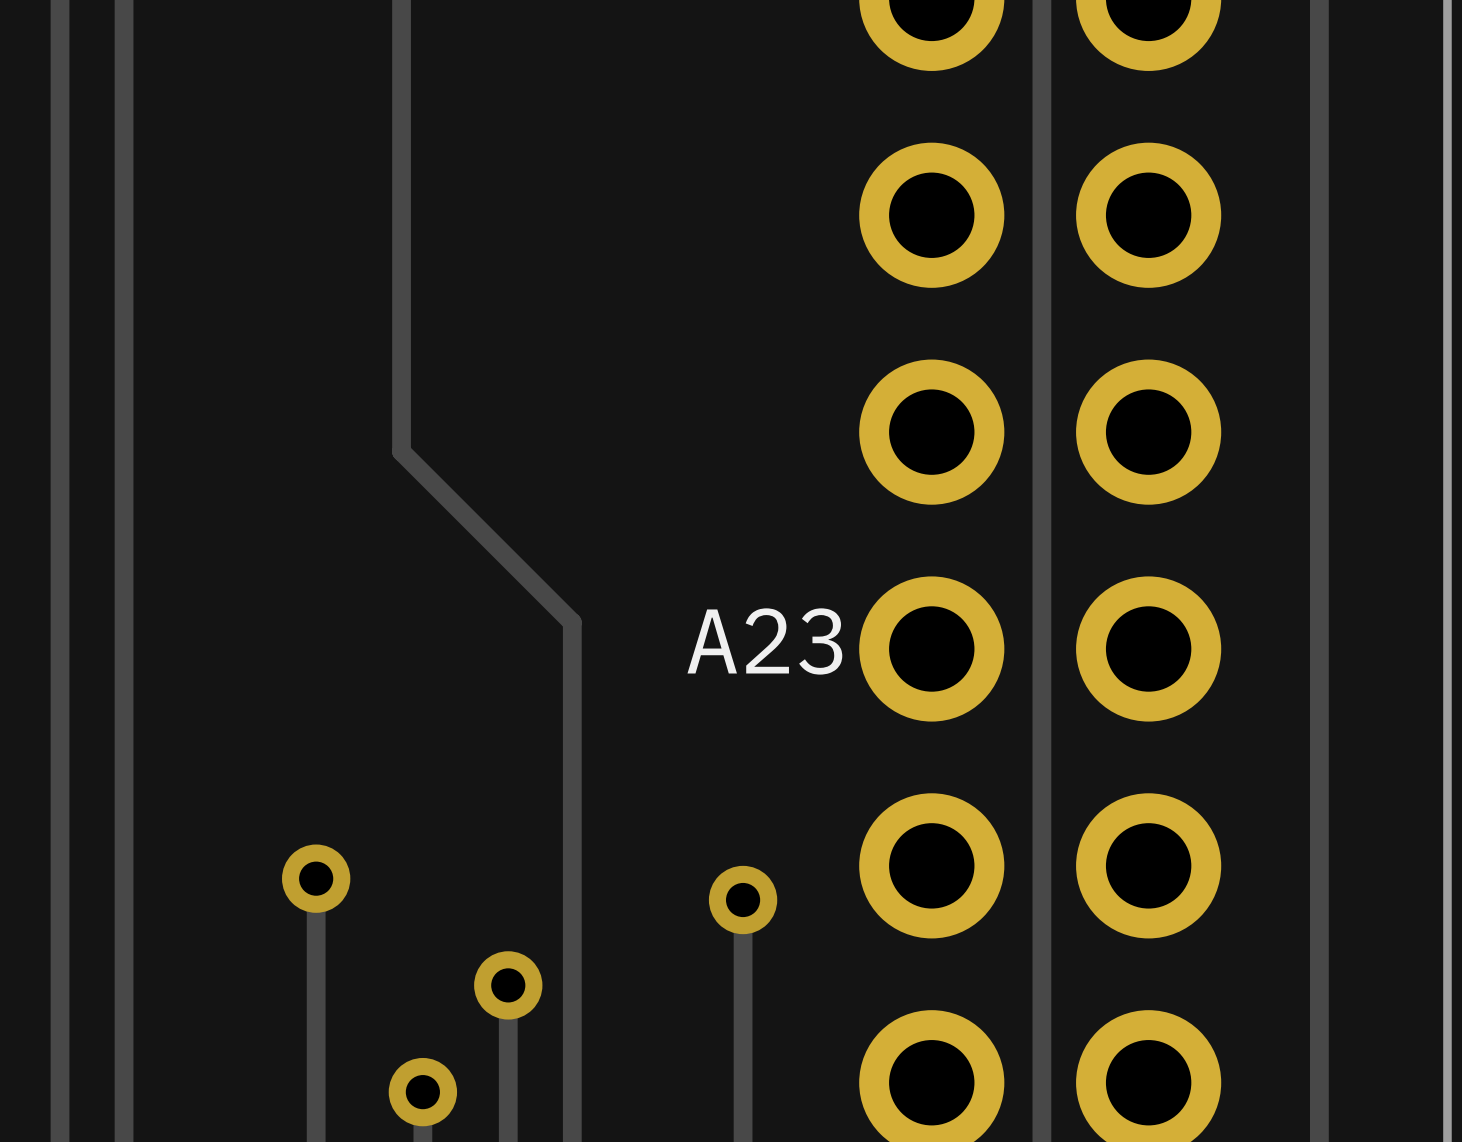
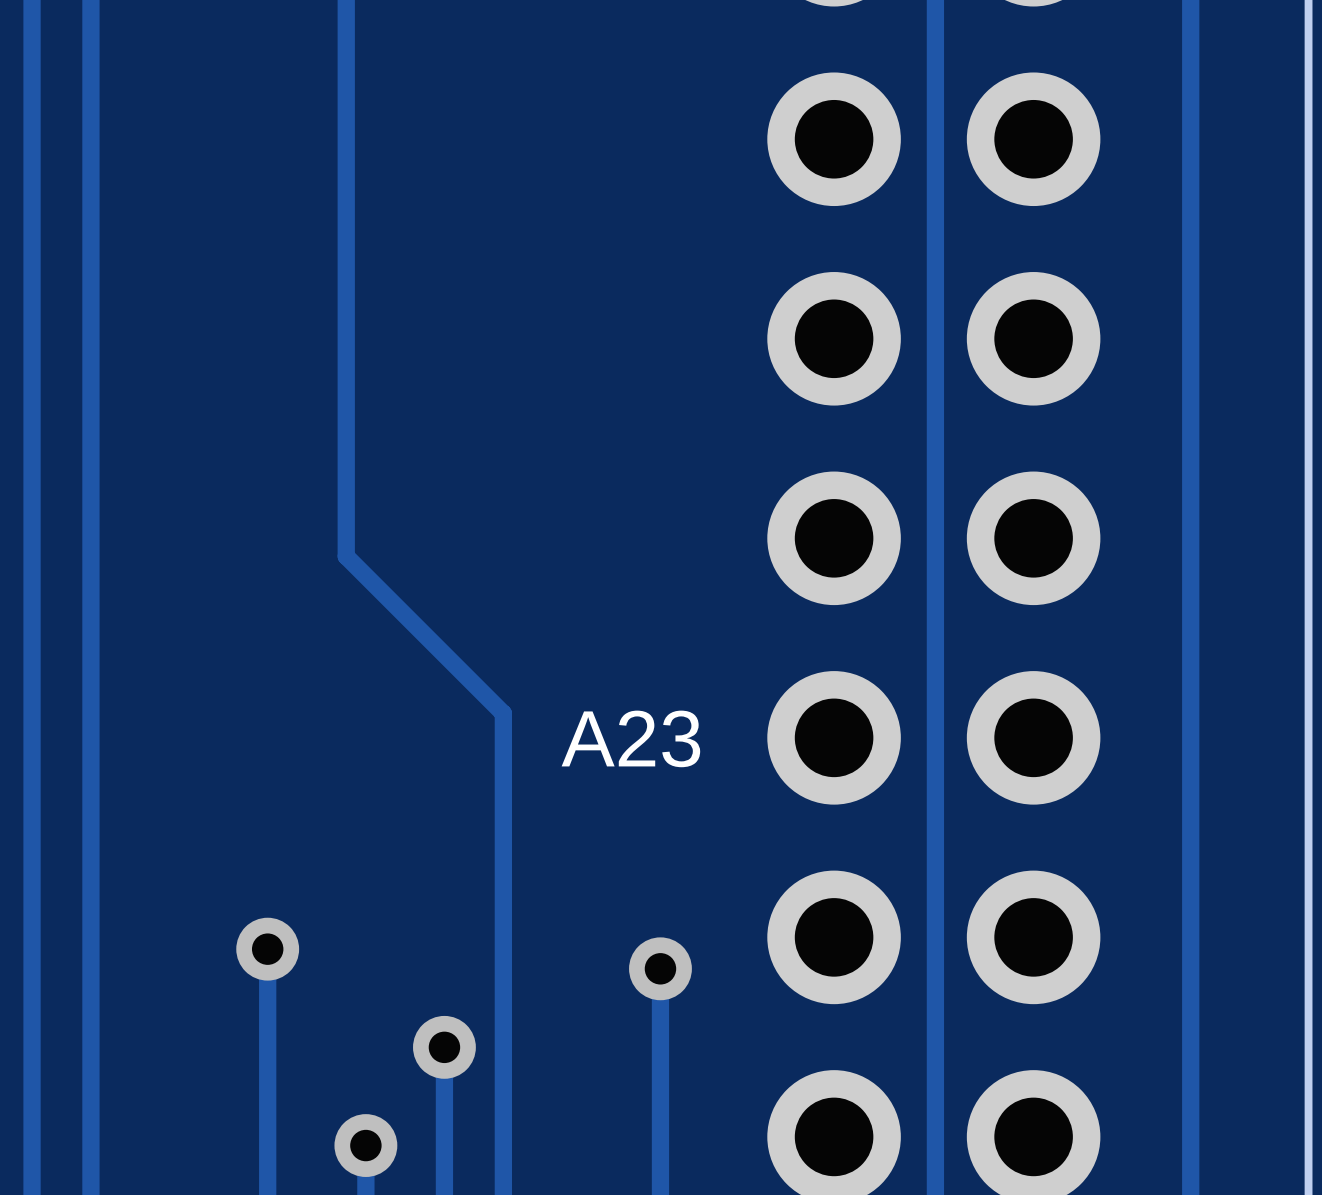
text position: A23 (764, 641) -> A23 (630, 738)

